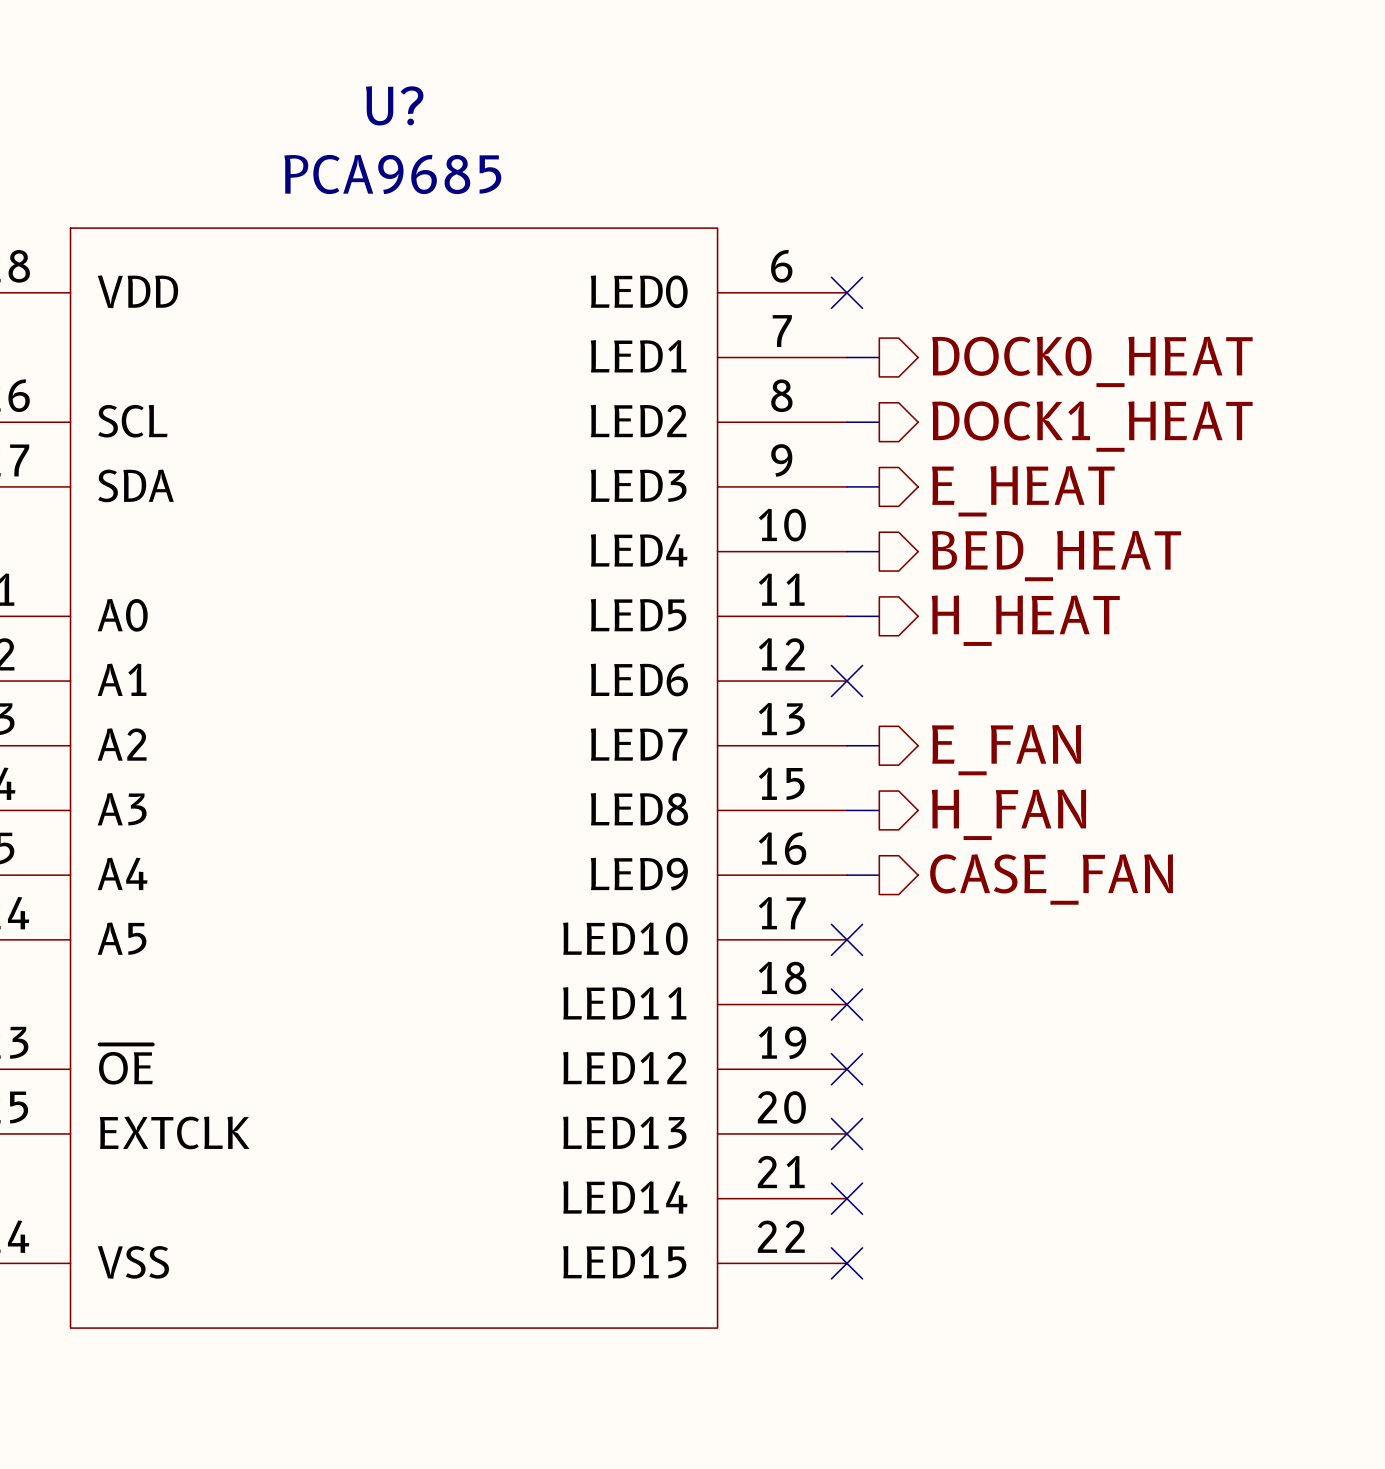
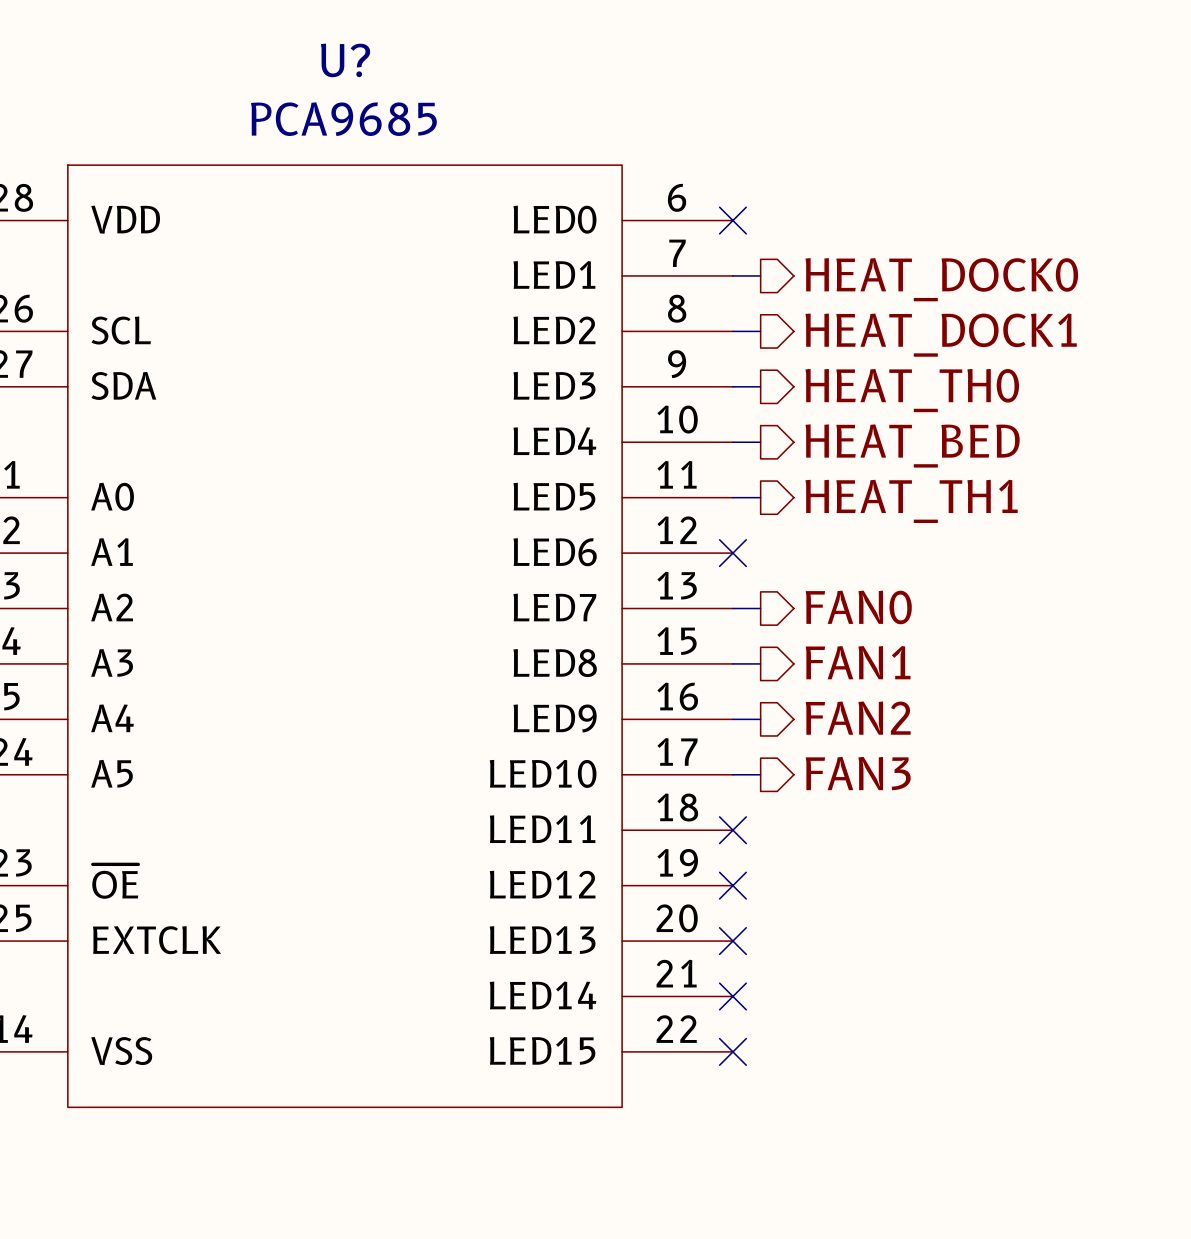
hierarchical label: DOCK0_HEAT (1092, 361) -> HEAT_DOCK0 (941, 279)
hierarchical label: DOCK1_HEAT (1092, 426) -> HEAT_DOCK1 (941, 335)
hierarchical label: E_HEAT (1023, 491) -> HEAT_TH0 (912, 390)
hierarchical label: BED_HEAT (1056, 555) -> HEAT_BED (912, 445)
hierarchical label: H_HEAT (1025, 620) -> HEAT_TH1 (911, 501)
hierarchical label: E_FAN (1006, 750) -> FAN0 (858, 607)
hierarchical label: H_FAN (1008, 814) -> FAN1 (858, 662)
hierarchical label: CASE_FAN (1051, 879) -> FAN2 (858, 718)
hierarchical label: none -> FAN3 (858, 773)
wire: none -> (732, 774) (760, 774)
no-connect mark: (846, 939) -> none

